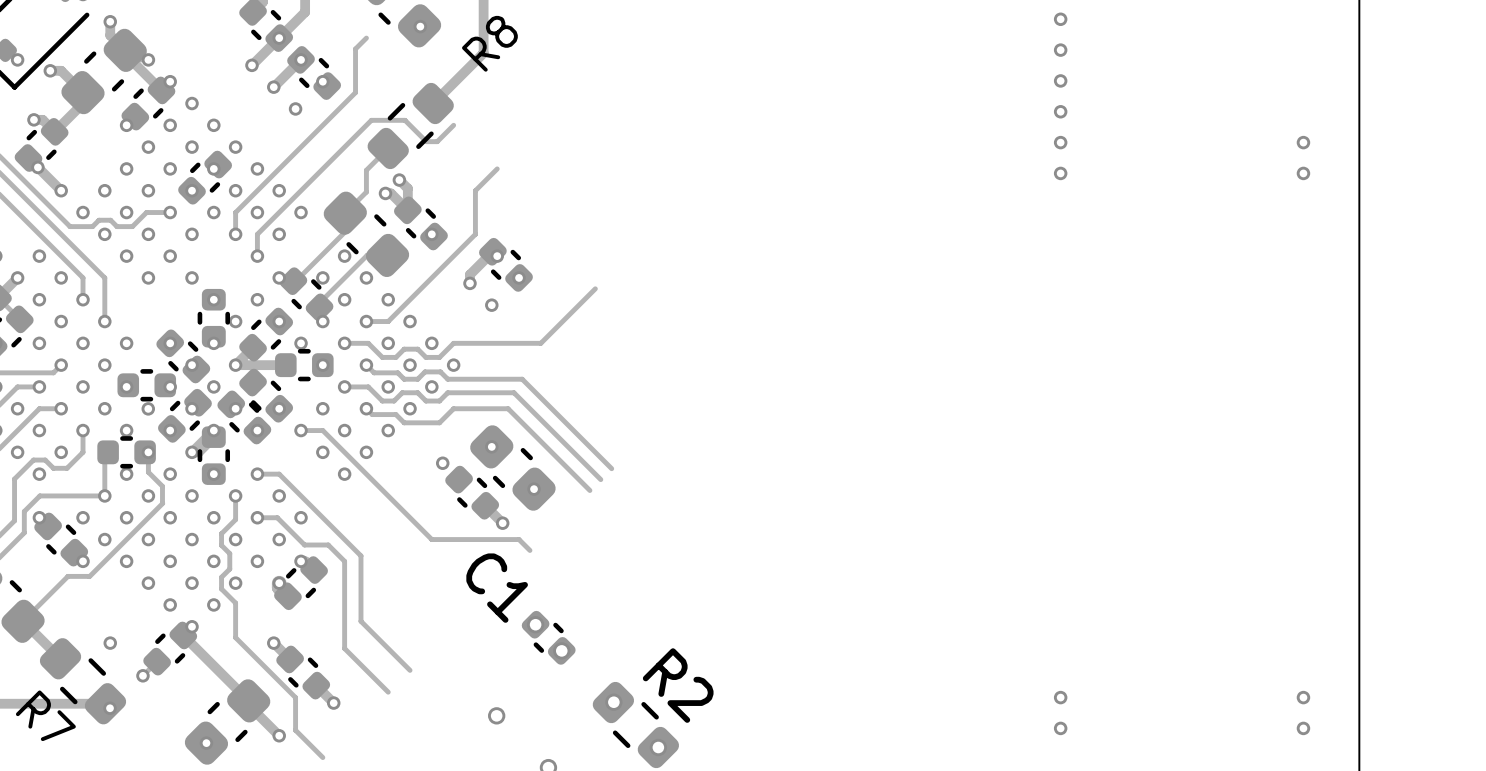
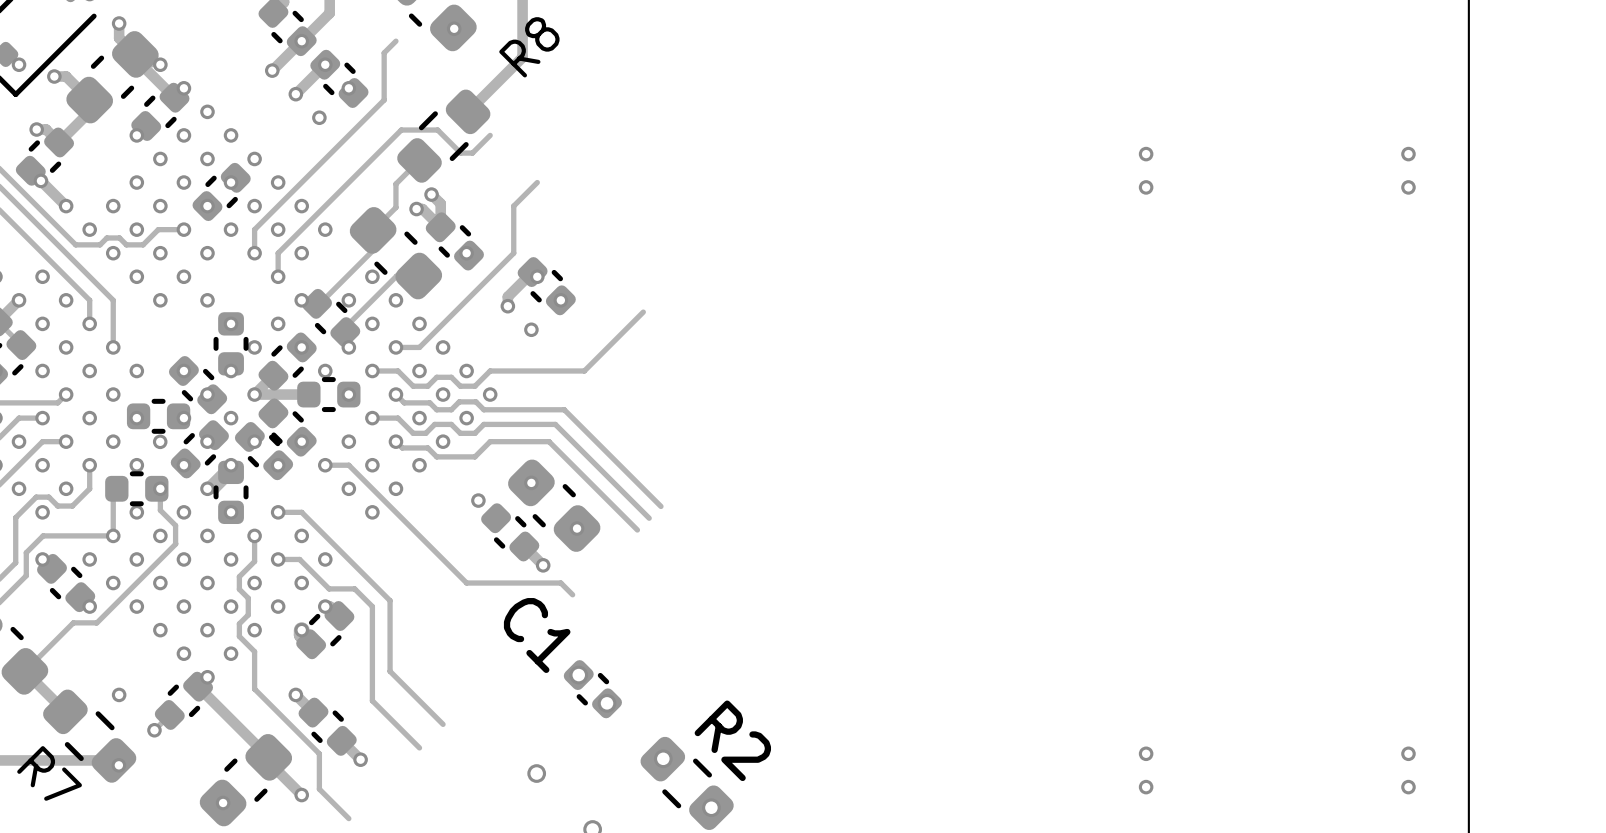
via: (1060, 19) -> none
via: (1060, 50) -> none
via: (1060, 80) -> none
via: (1060, 111) -> none

